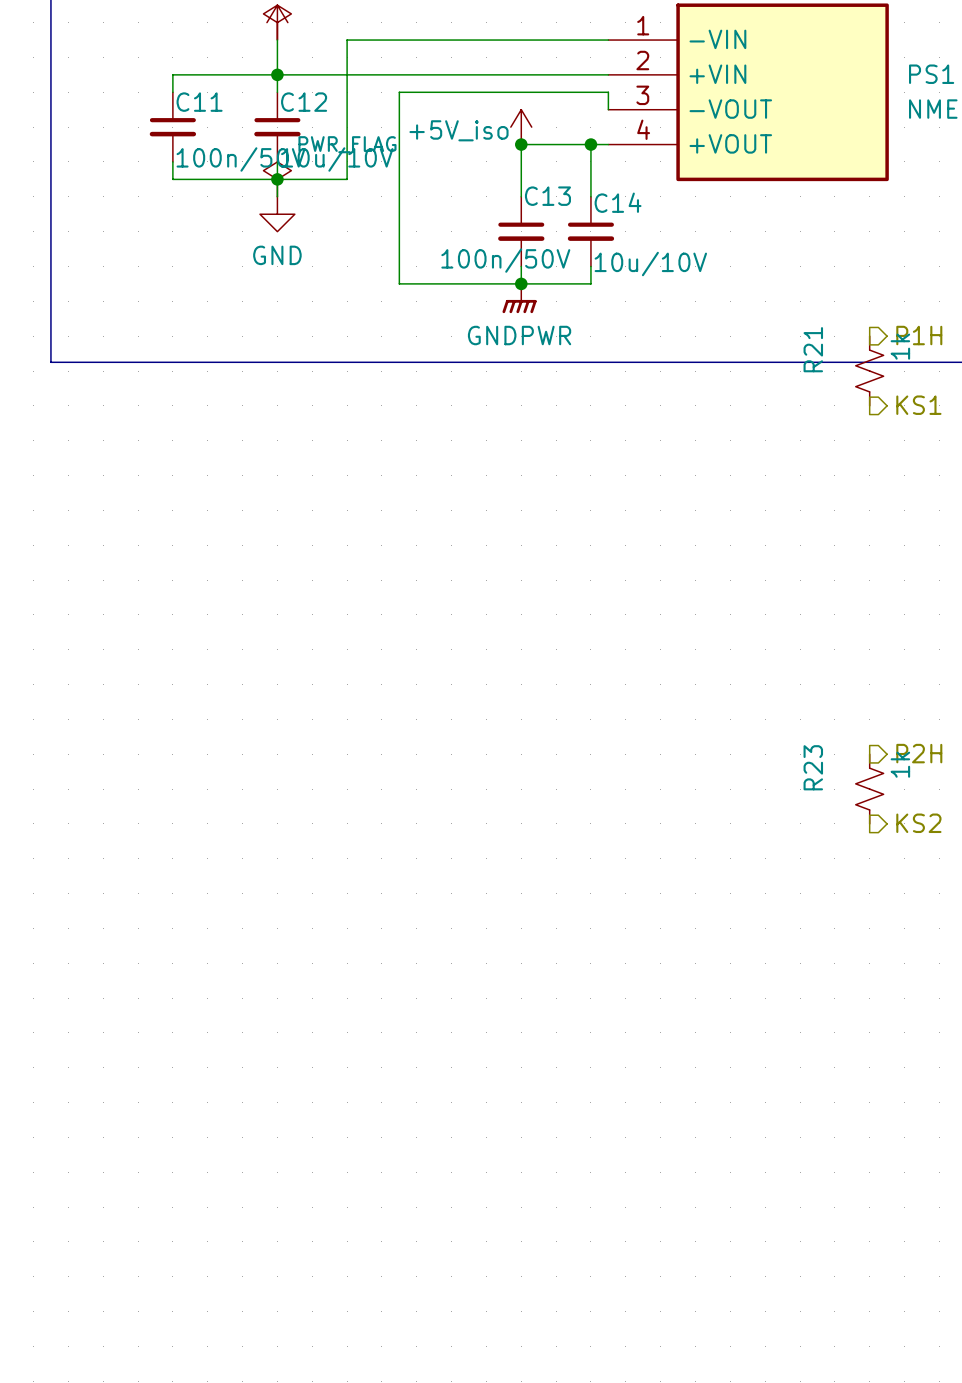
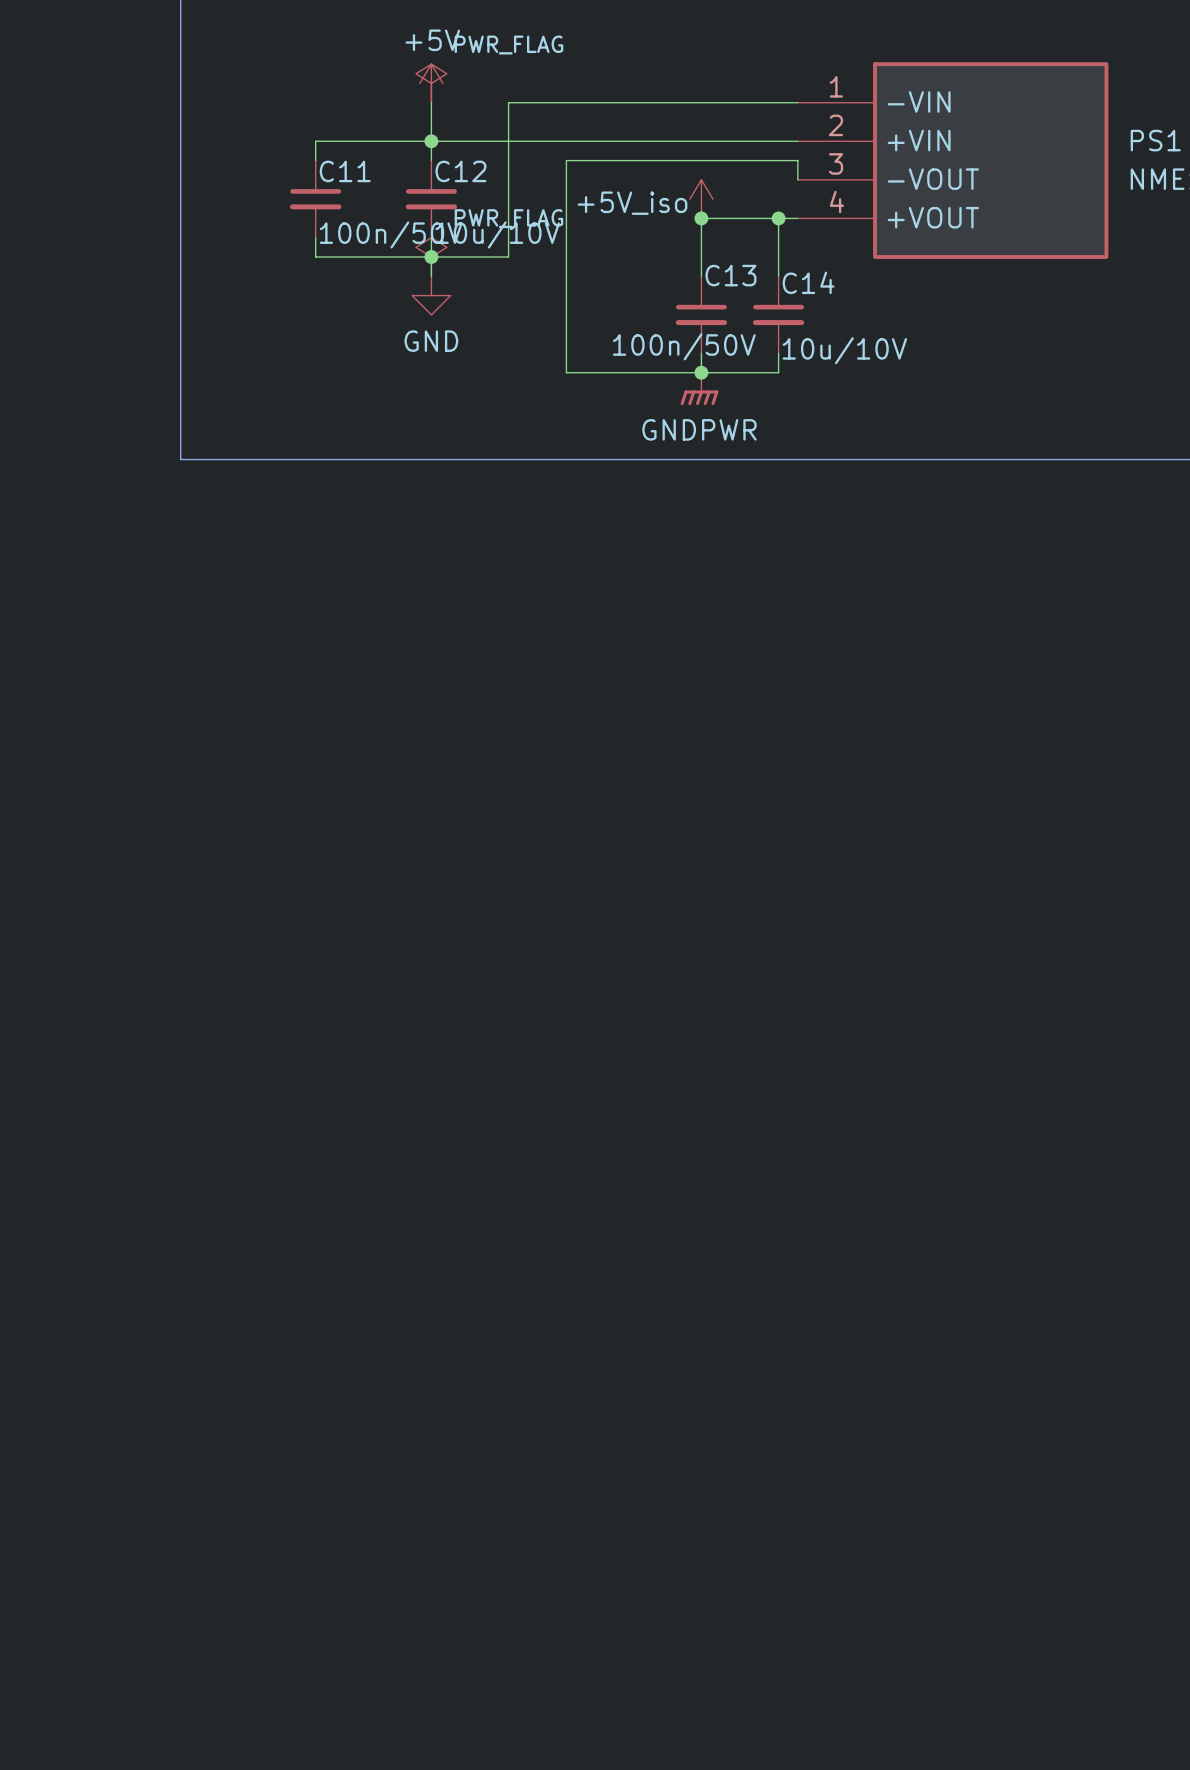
hierarchical label: P1H (919, 335) -> none
R21: 1k (869, 371) -> none
hierarchical label: KS1 (918, 405) -> none
hierarchical label: P2H (919, 753) -> none
R23: 1k (869, 789) -> none
hierarchical label: KS2 (918, 823) -> none

